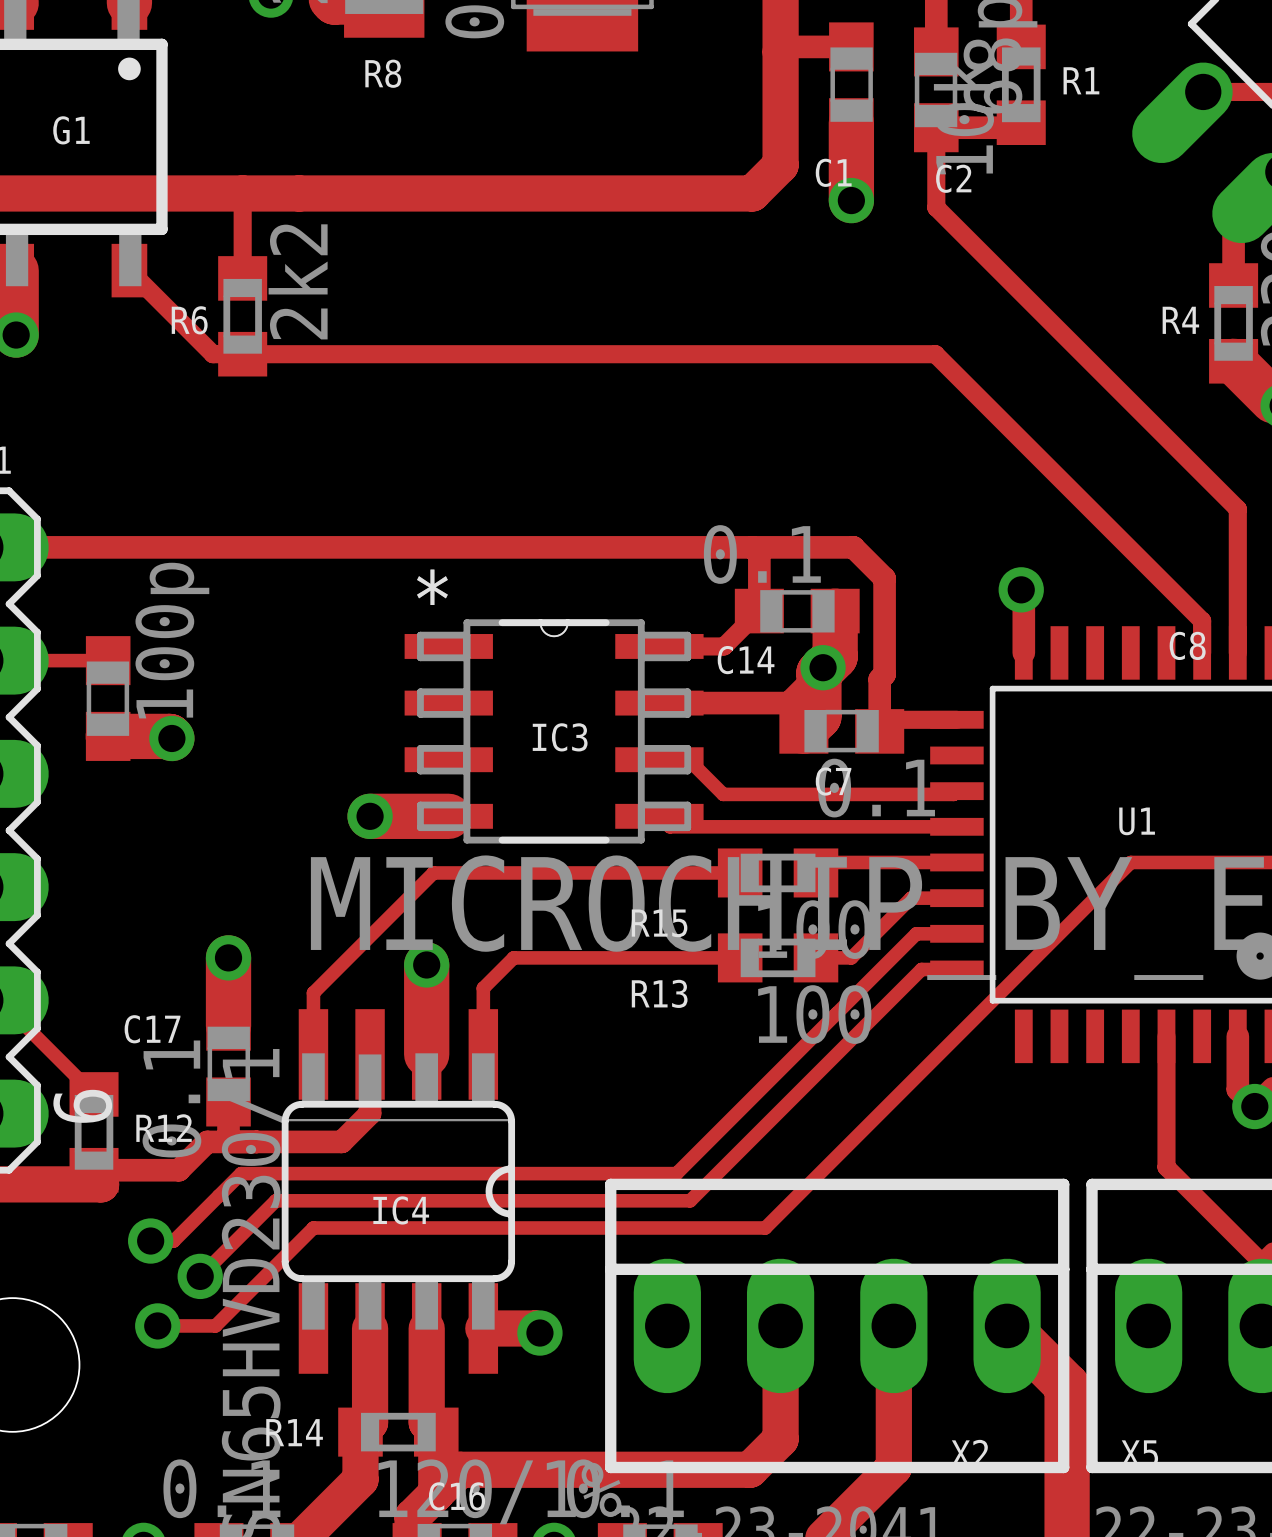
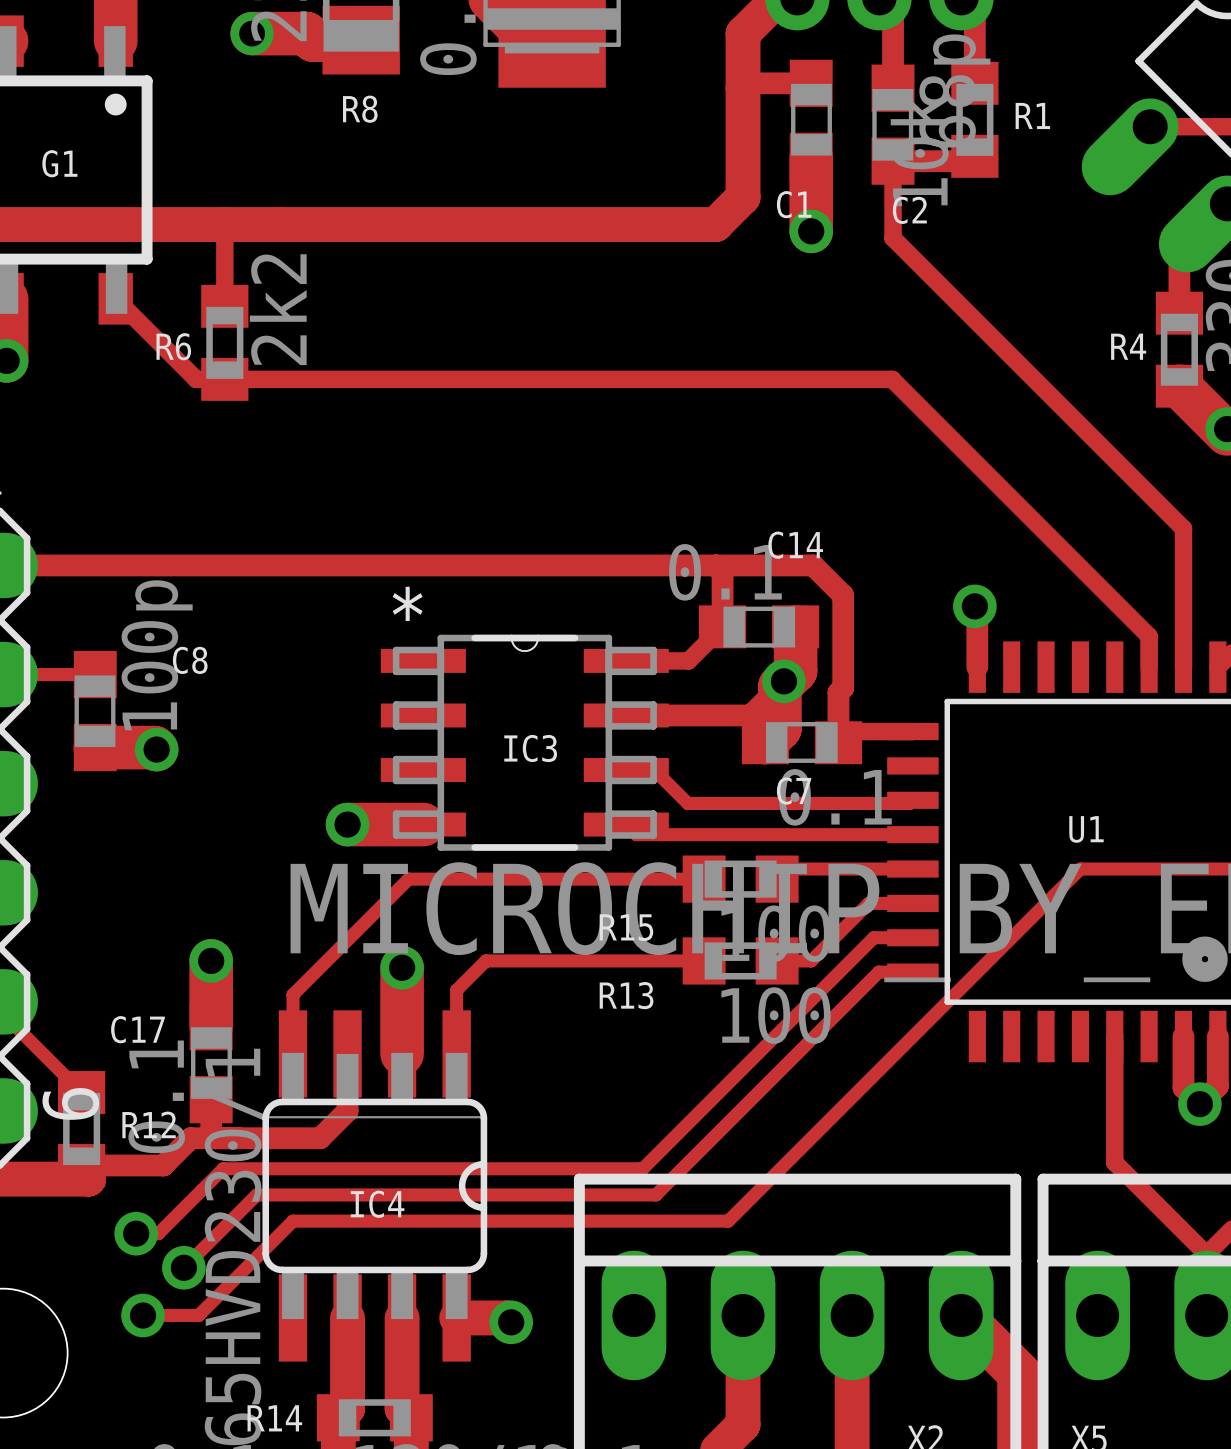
C8 name position: C8 (1187, 645) -> C8 (190, 660)
C14 name position: C14 (746, 660) -> C14 (795, 545)

